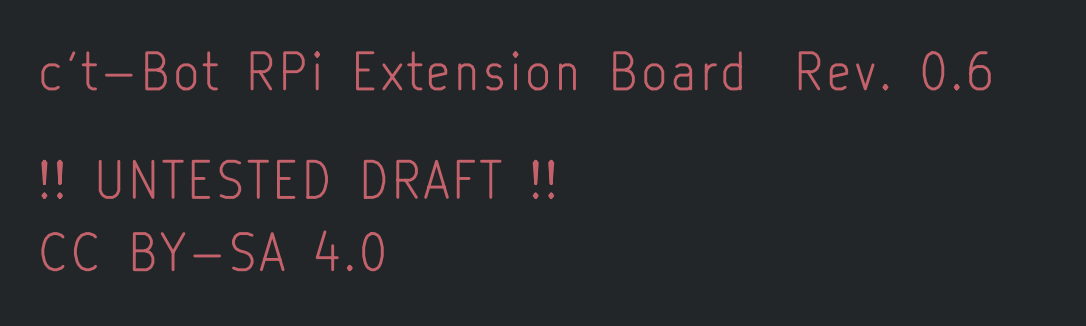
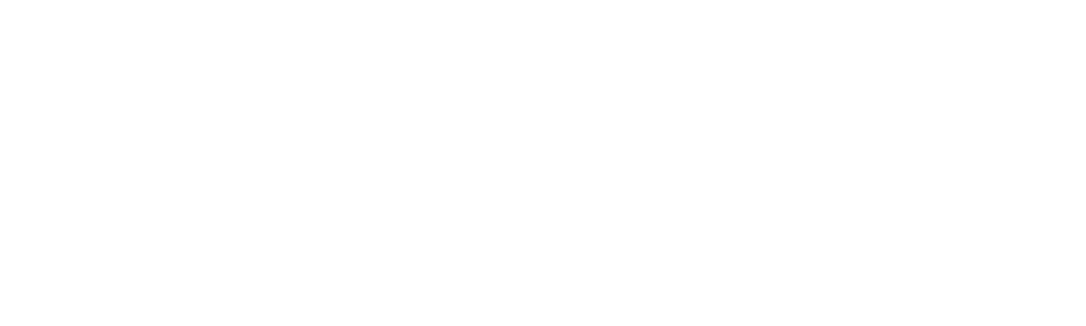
text: c't-Bot RPi Extension Board (391, 70) -> none
text: Rev. 0.6 (894, 70) -> none
text: !! UNTESTED DRAFT !! (297, 179) -> none
text: CC BY-SA 4.0 (212, 250) -> none

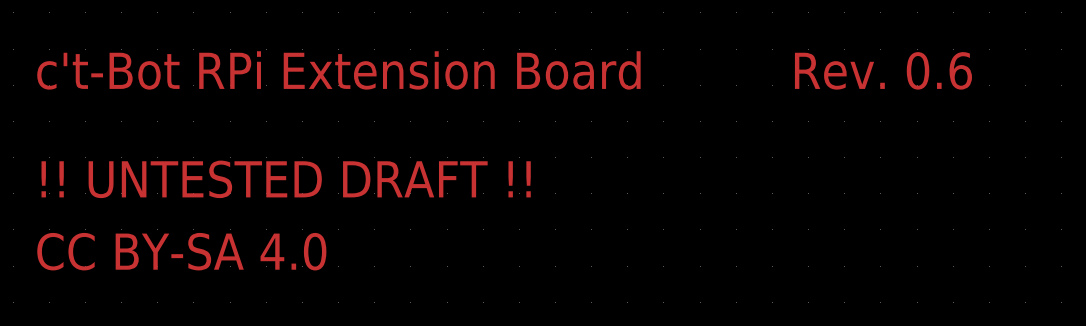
text: none -> c't-Bot RPi Extension Board (338, 70)
text: none -> Rev. 0.6 (883, 70)
text: none -> !! UNTESTED DRAFT !! (286, 179)
text: none -> CC BY-SA 4.0 (181, 251)

